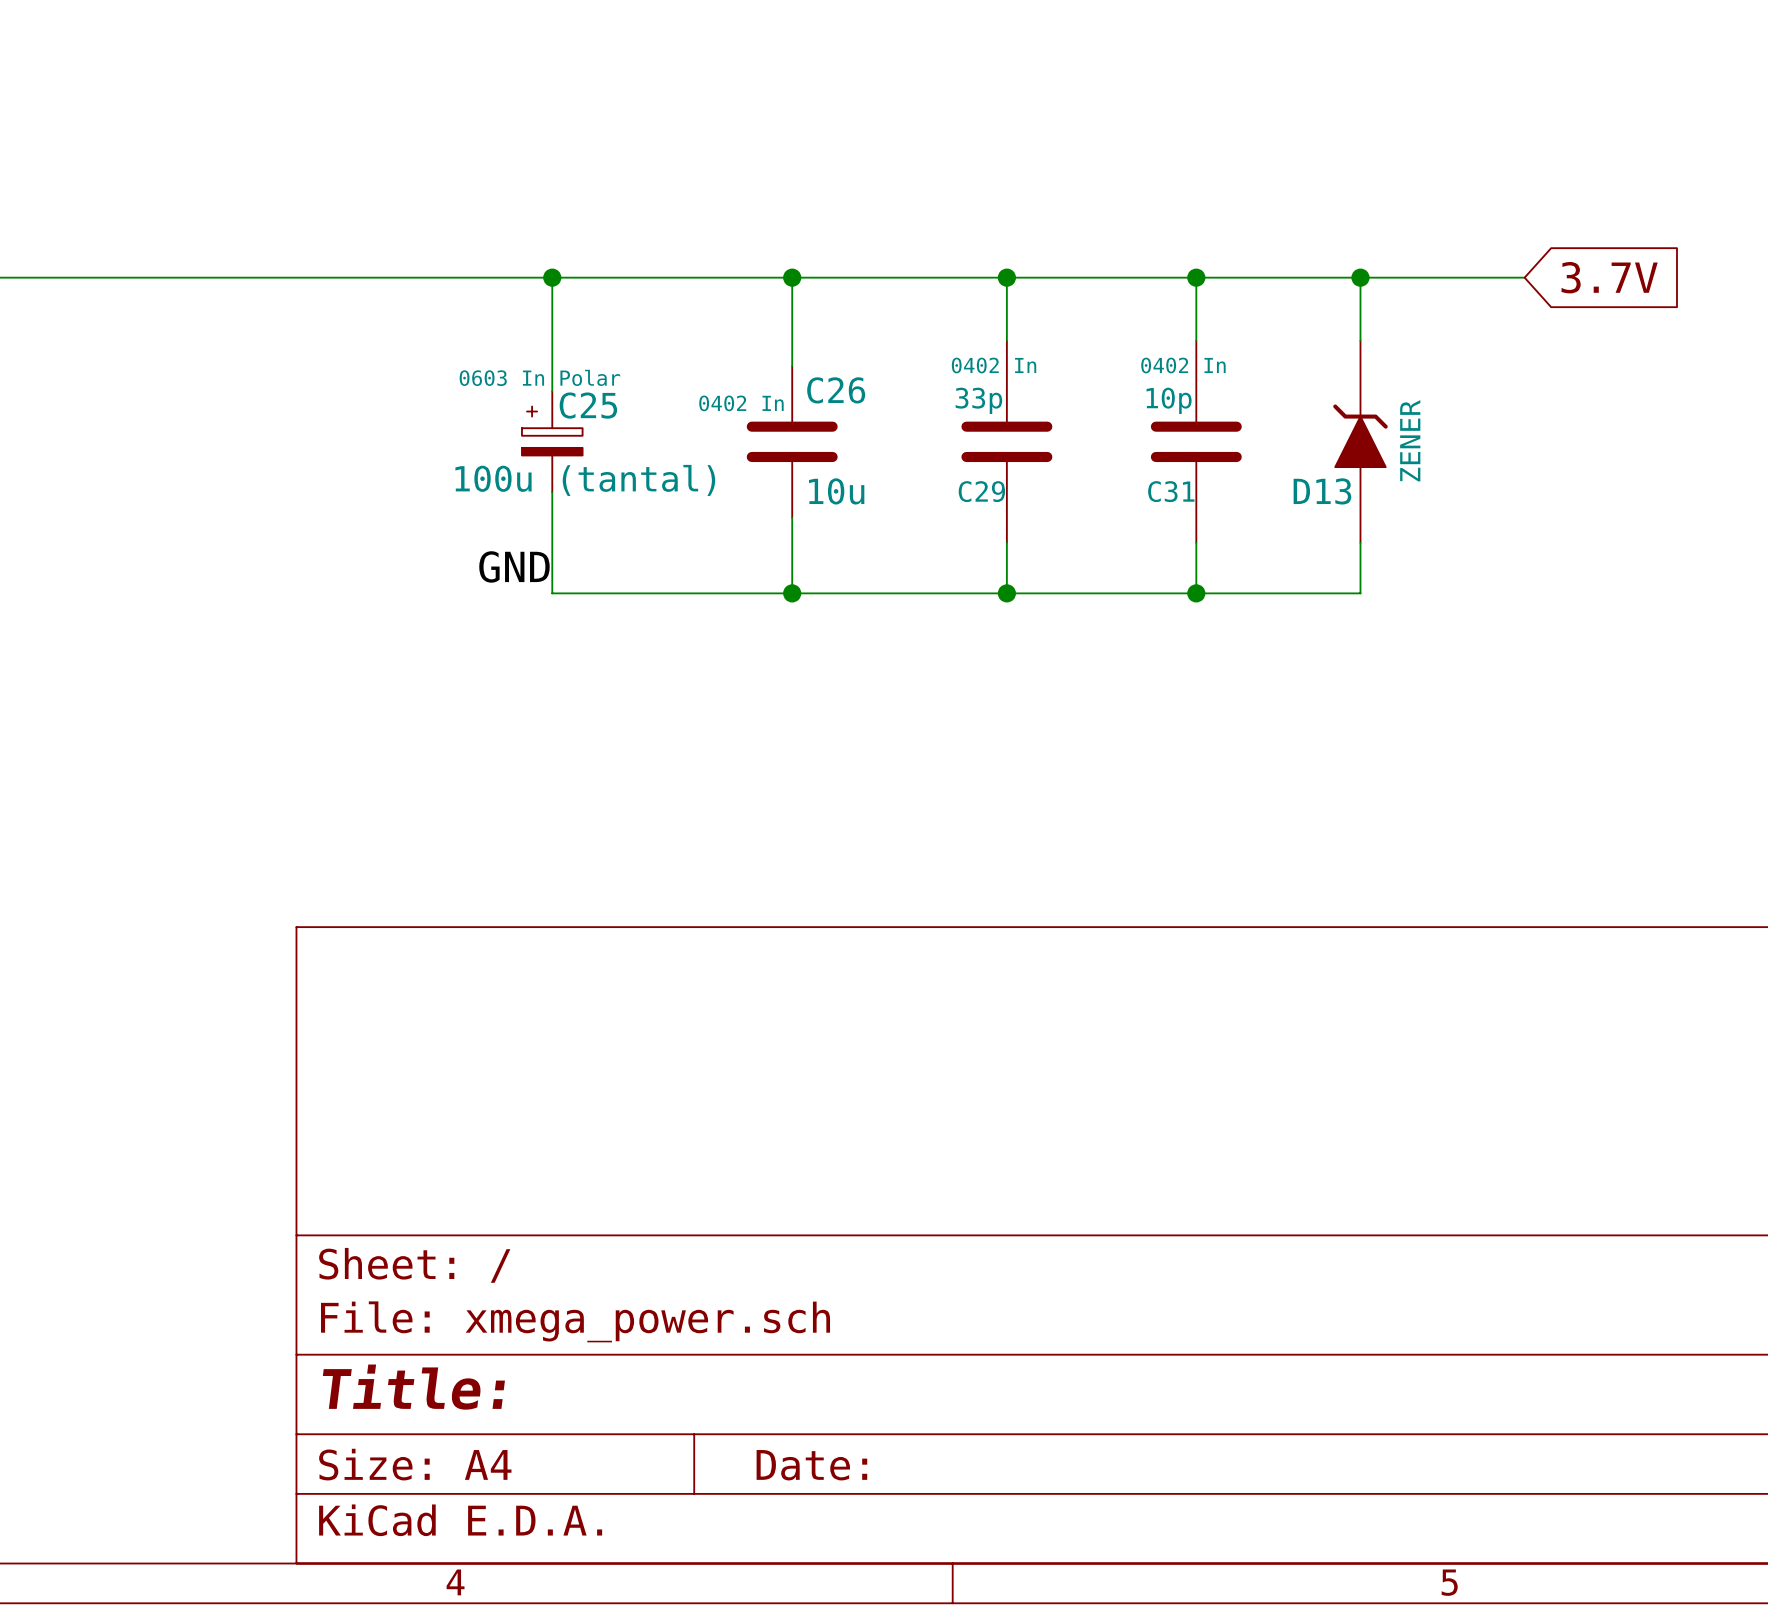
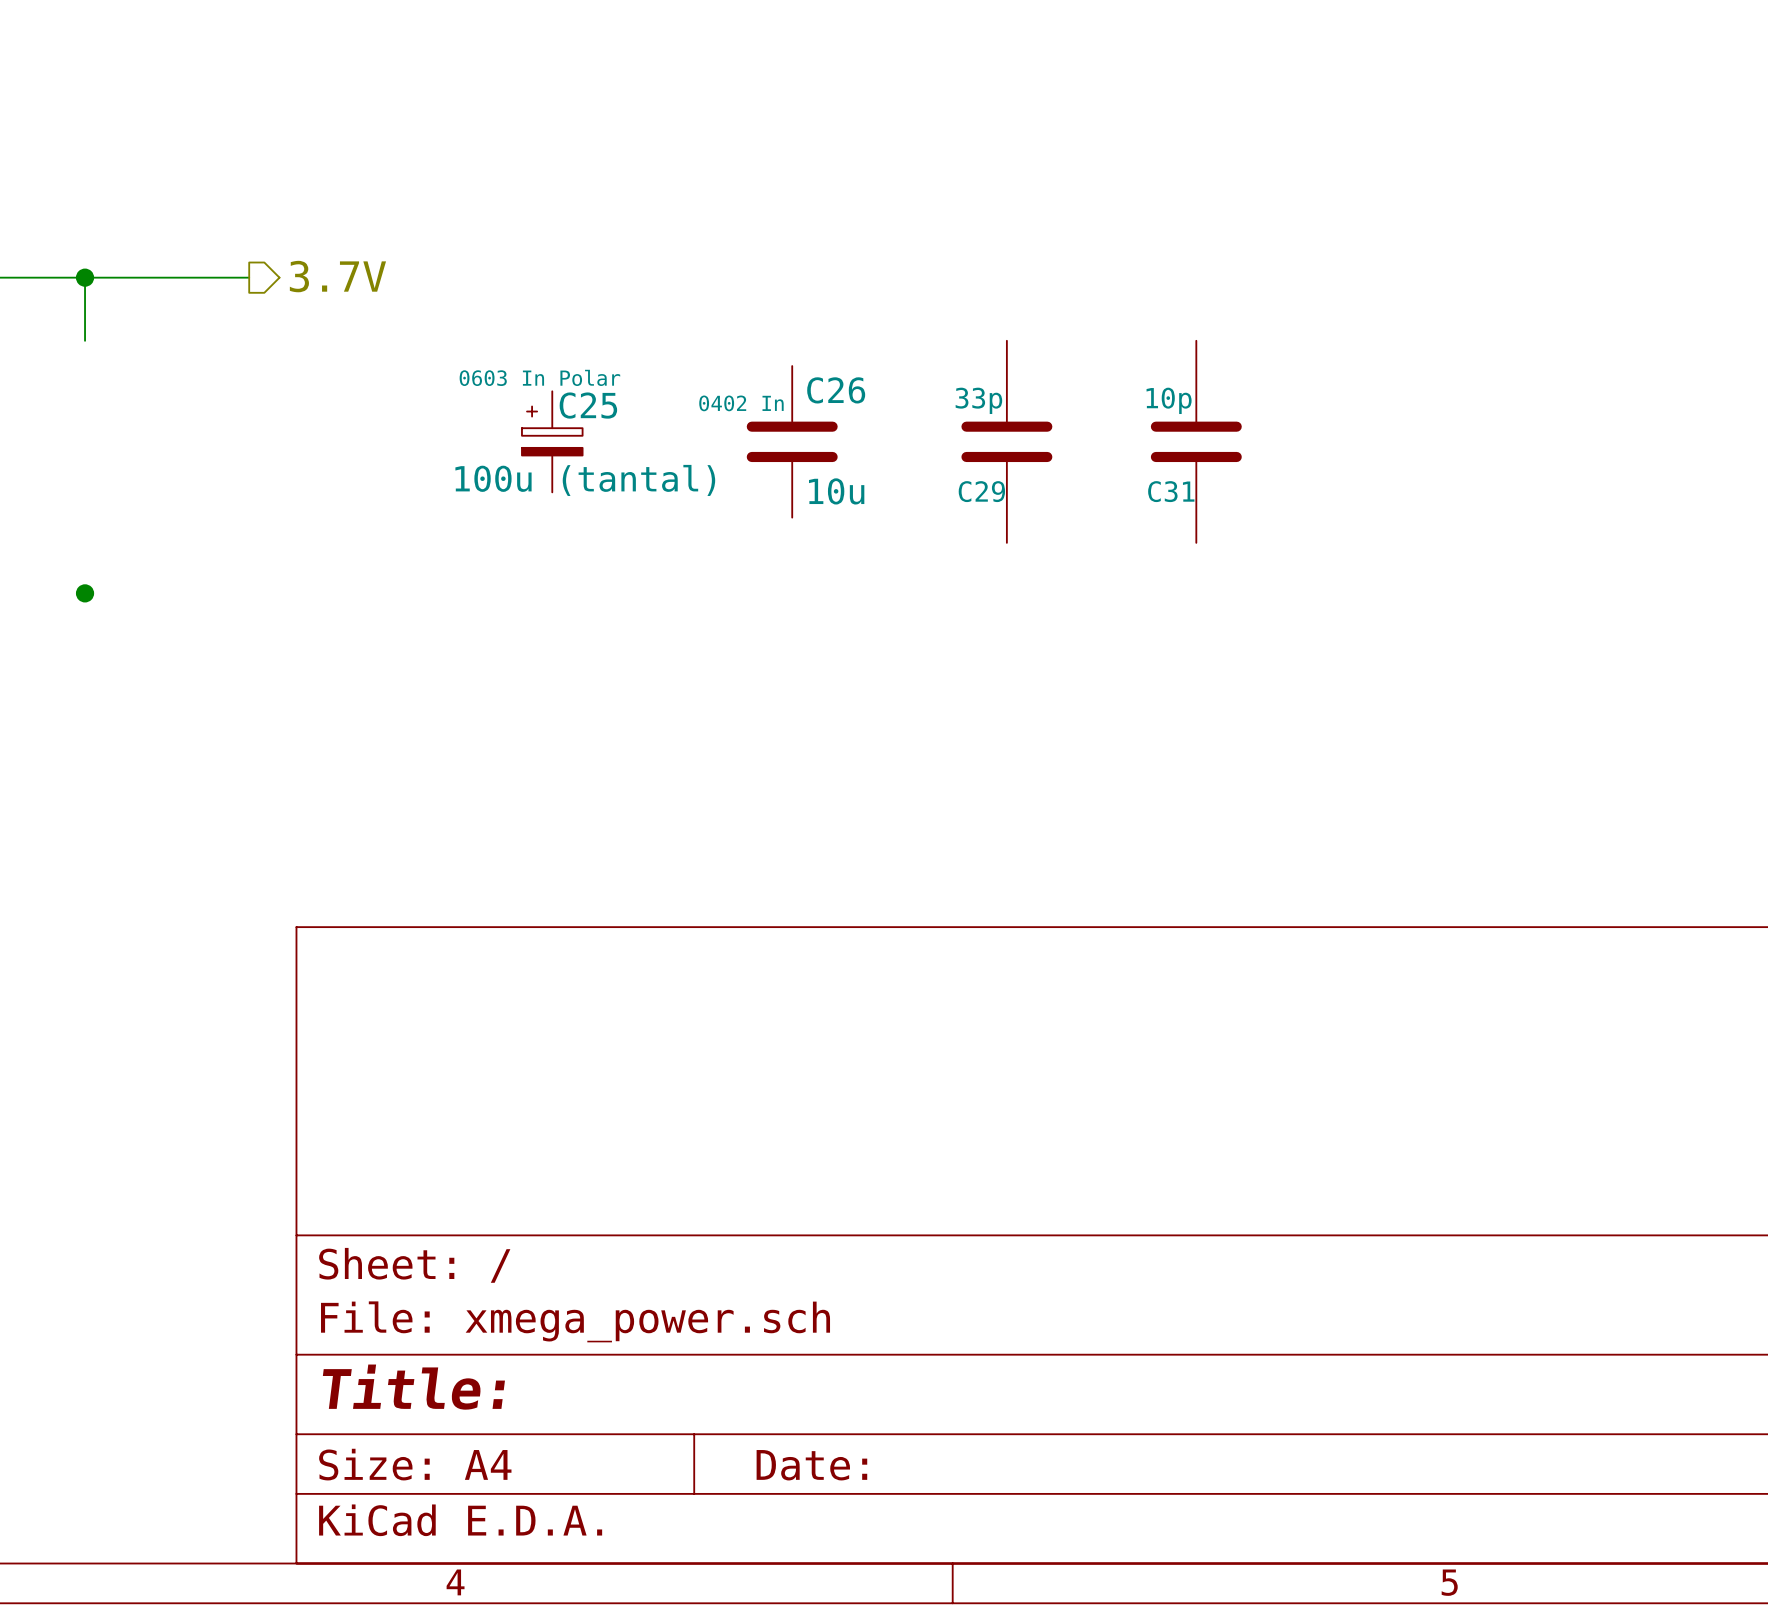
hierarchical label: none -> 3.7V (337, 276)
wire: none -> (85, 277) (85, 340)
junction: none -> (85, 277)
wire: (249, 277) (1524, 277) -> none
wire: (552, 277) (552, 391) -> none
junction: (552, 277) -> none
wire: (792, 277) (792, 366) -> none
junction: (792, 277) -> none
wire: (1006, 277) (1006, 340) -> none
junction: (1006, 277) -> none
wire: (1196, 277) (1196, 340) -> none
junction: (1196, 277) -> none
wire: (1360, 277) (1360, 340) -> none
junction: (1360, 277) -> none
global label: 3.7V (1609, 277) -> none
C29 text: 0402 In (994, 365) -> none
C31 text: 0402 In (1183, 365) -> none
D13: ZENER (1360, 441) -> none
wire: (552, 492) (552, 593) (1360, 593) (1360, 542) -> none
wire: (792, 517) (792, 593) -> none
wire: (1006, 542) (1006, 593) -> none
wire: (1196, 542) (1196, 593) -> none
label: GND (514, 566) -> none
junction: none -> (85, 593)
junction: (792, 593) -> none
junction: (1006, 593) -> none
junction: (1196, 593) -> none

